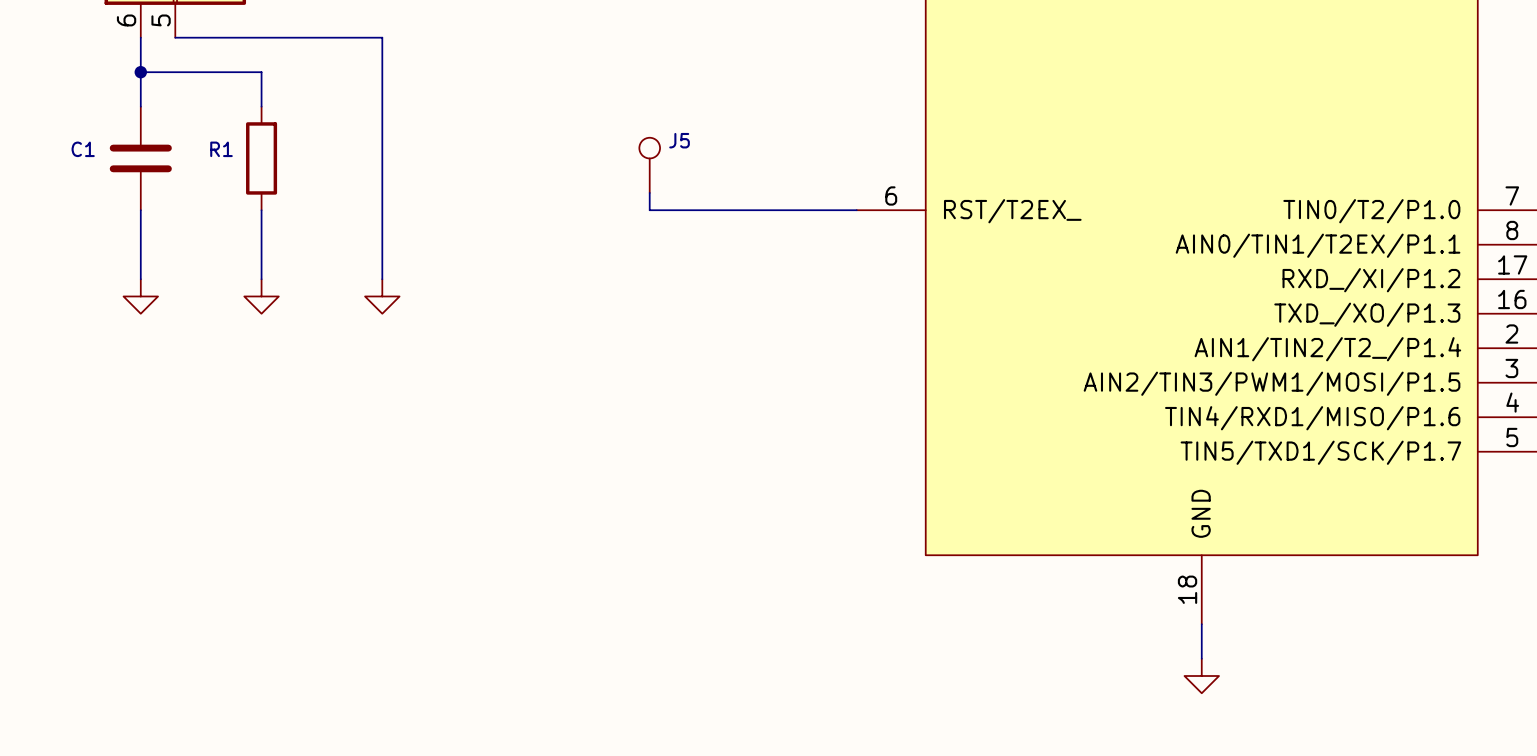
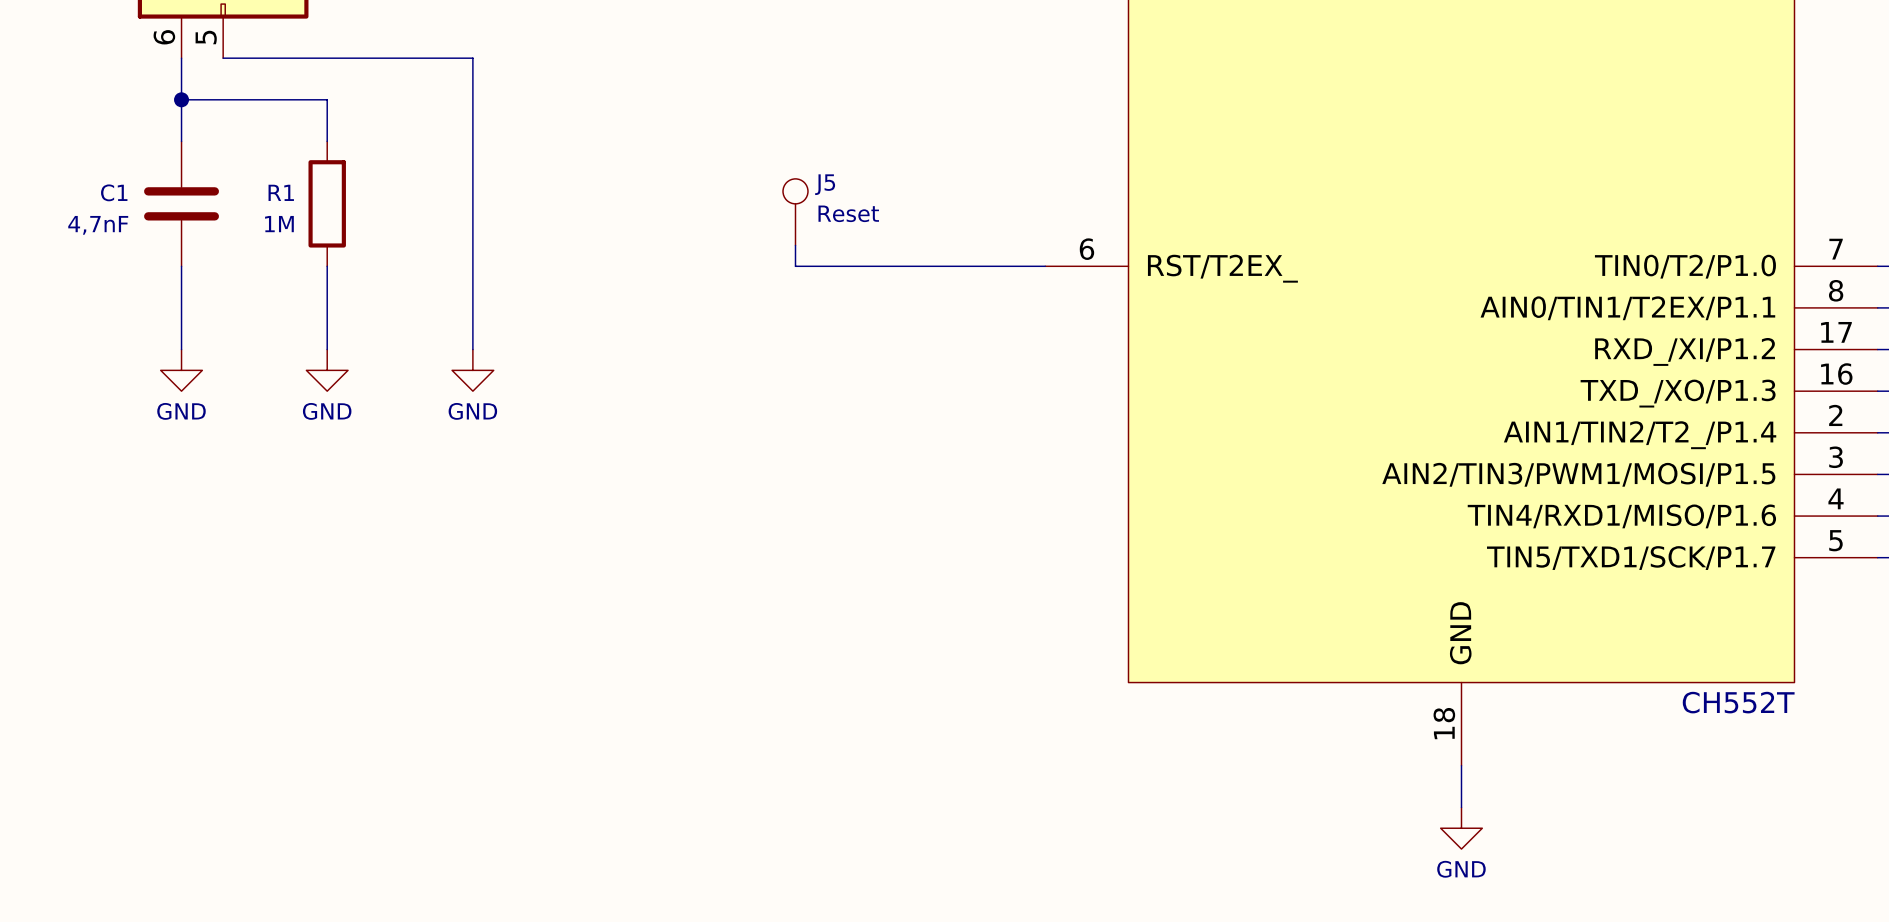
J5 value: none -> Reset (848, 213)
C1 value: none -> 4,7nF (98, 225)
R1 value: none -> 1M (279, 224)
power symbol text: none -> GND (181, 411)
power symbol text: none -> GND (327, 411)
power symbol text: none -> GND (472, 411)
part value: none -> CH552T (1738, 702)
power symbol text: none -> GND (1461, 869)

